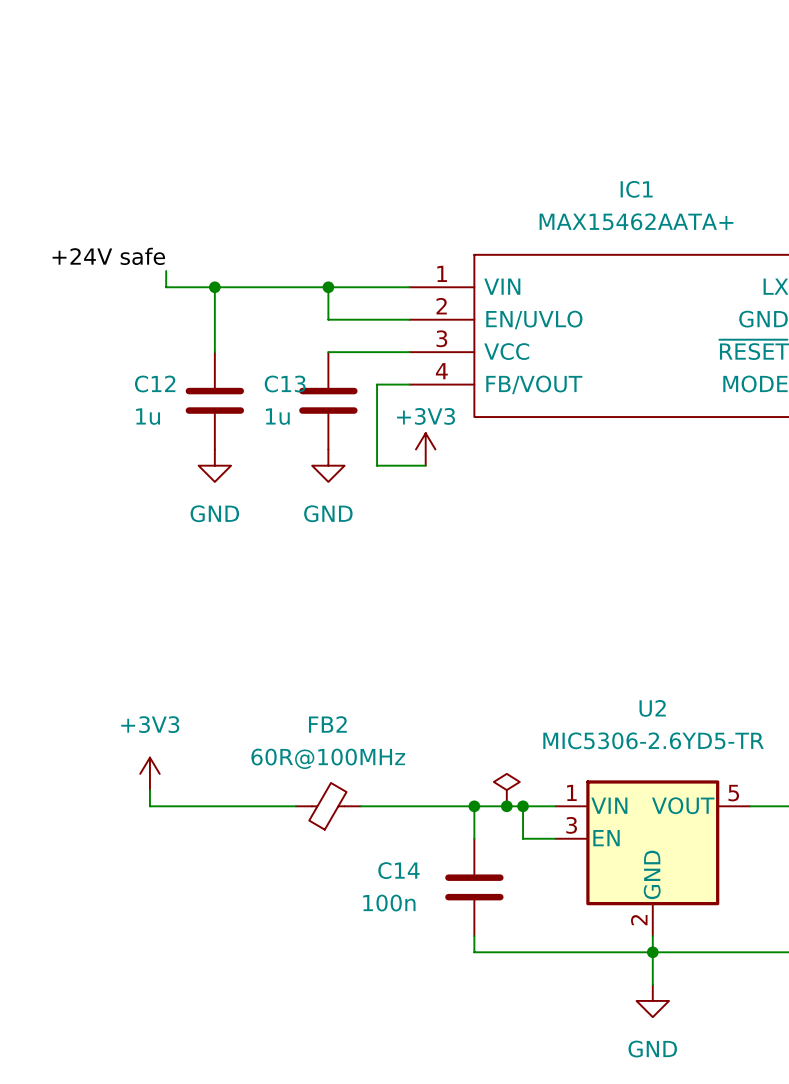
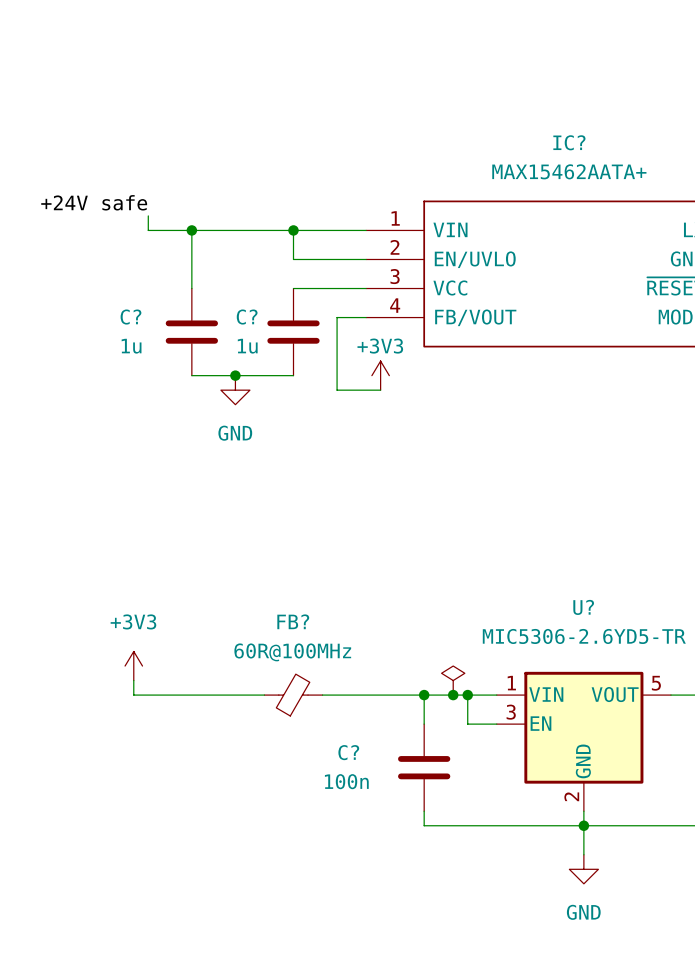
IC1 name: IC1 (636, 189) -> IC? (569, 142)
C12 name: C12 (155, 383) -> C? (130, 317)
C13 name: C13 (285, 383) -> C? (247, 317)
wire: none -> (191, 375) (293, 375)
junction: none -> (235, 375)
power symbol: GND (214, 465) -> none
power symbol: none -> GND (235, 390)
power symbol: GND (328, 465) -> none
U2 name: U2 (652, 708) -> U? (583, 607)
FB2 name: FB2 (327, 724) -> FB? (293, 621)
C14 name: C14 (398, 870) -> C? (348, 752)

